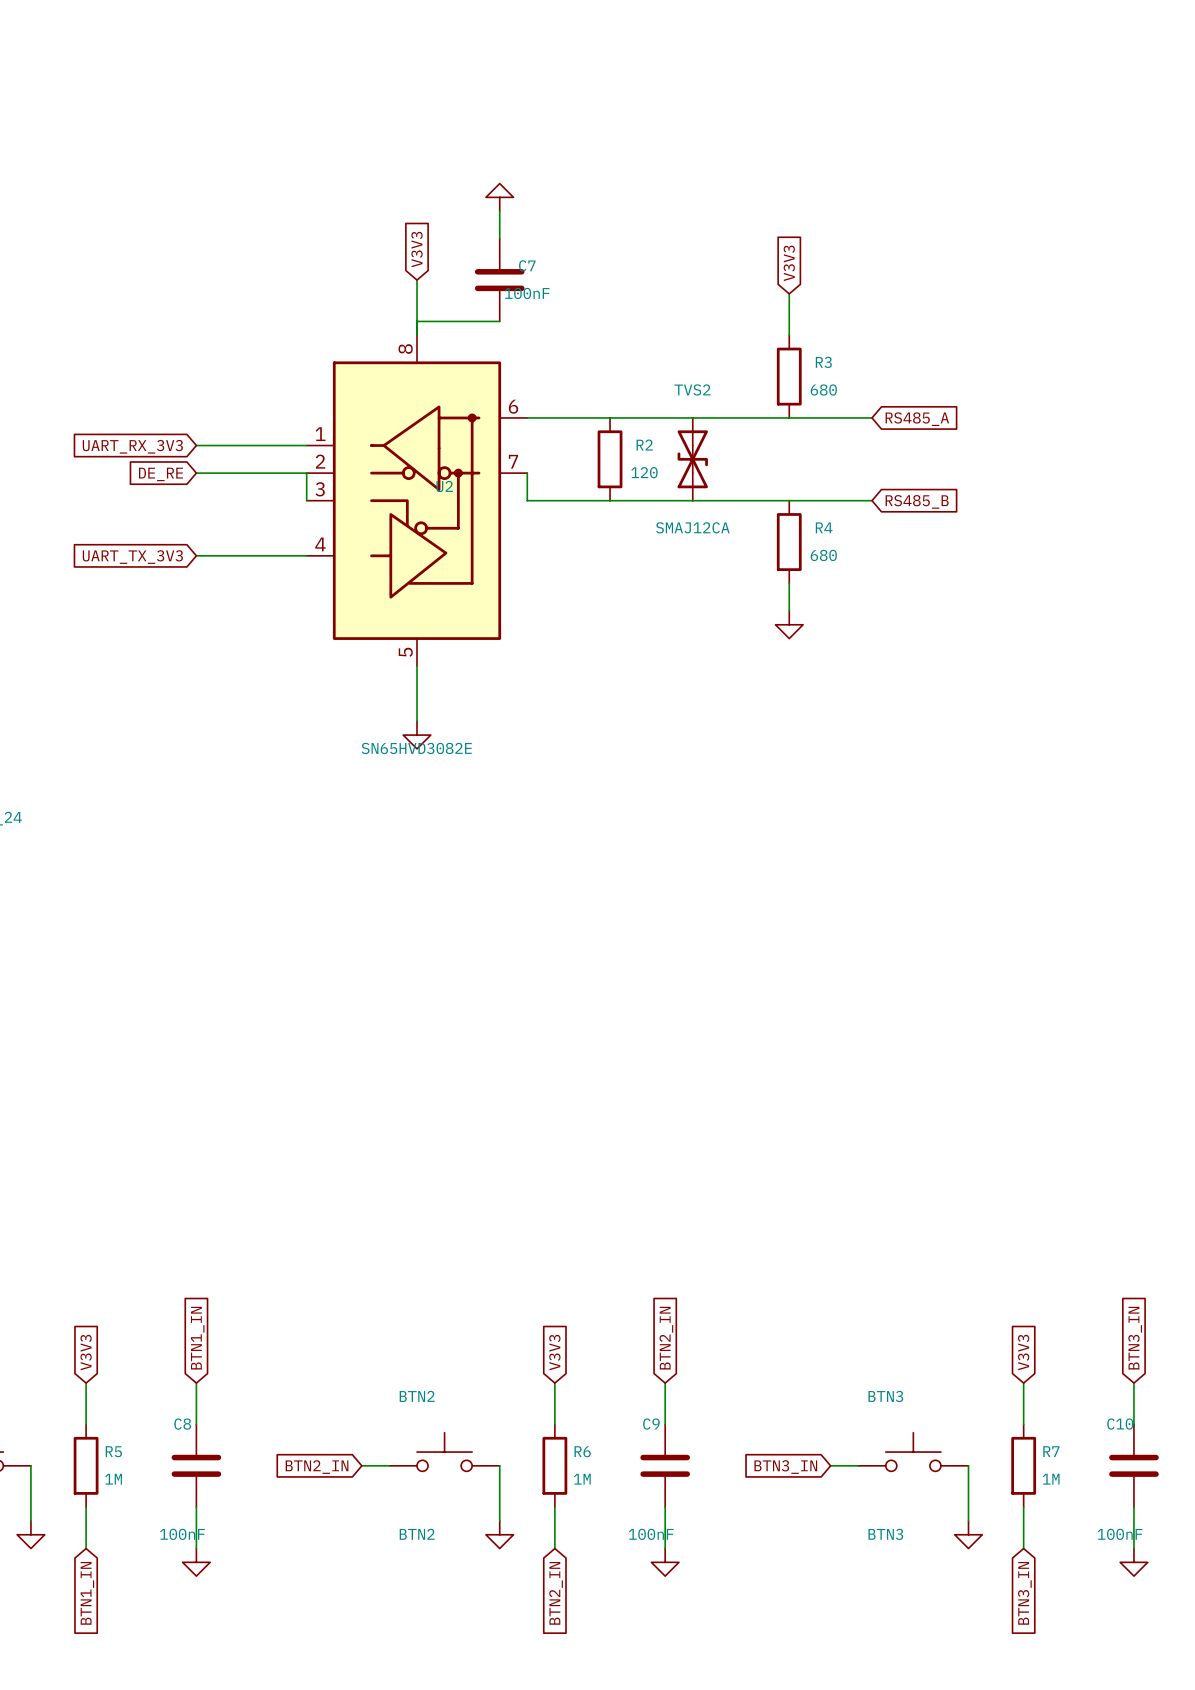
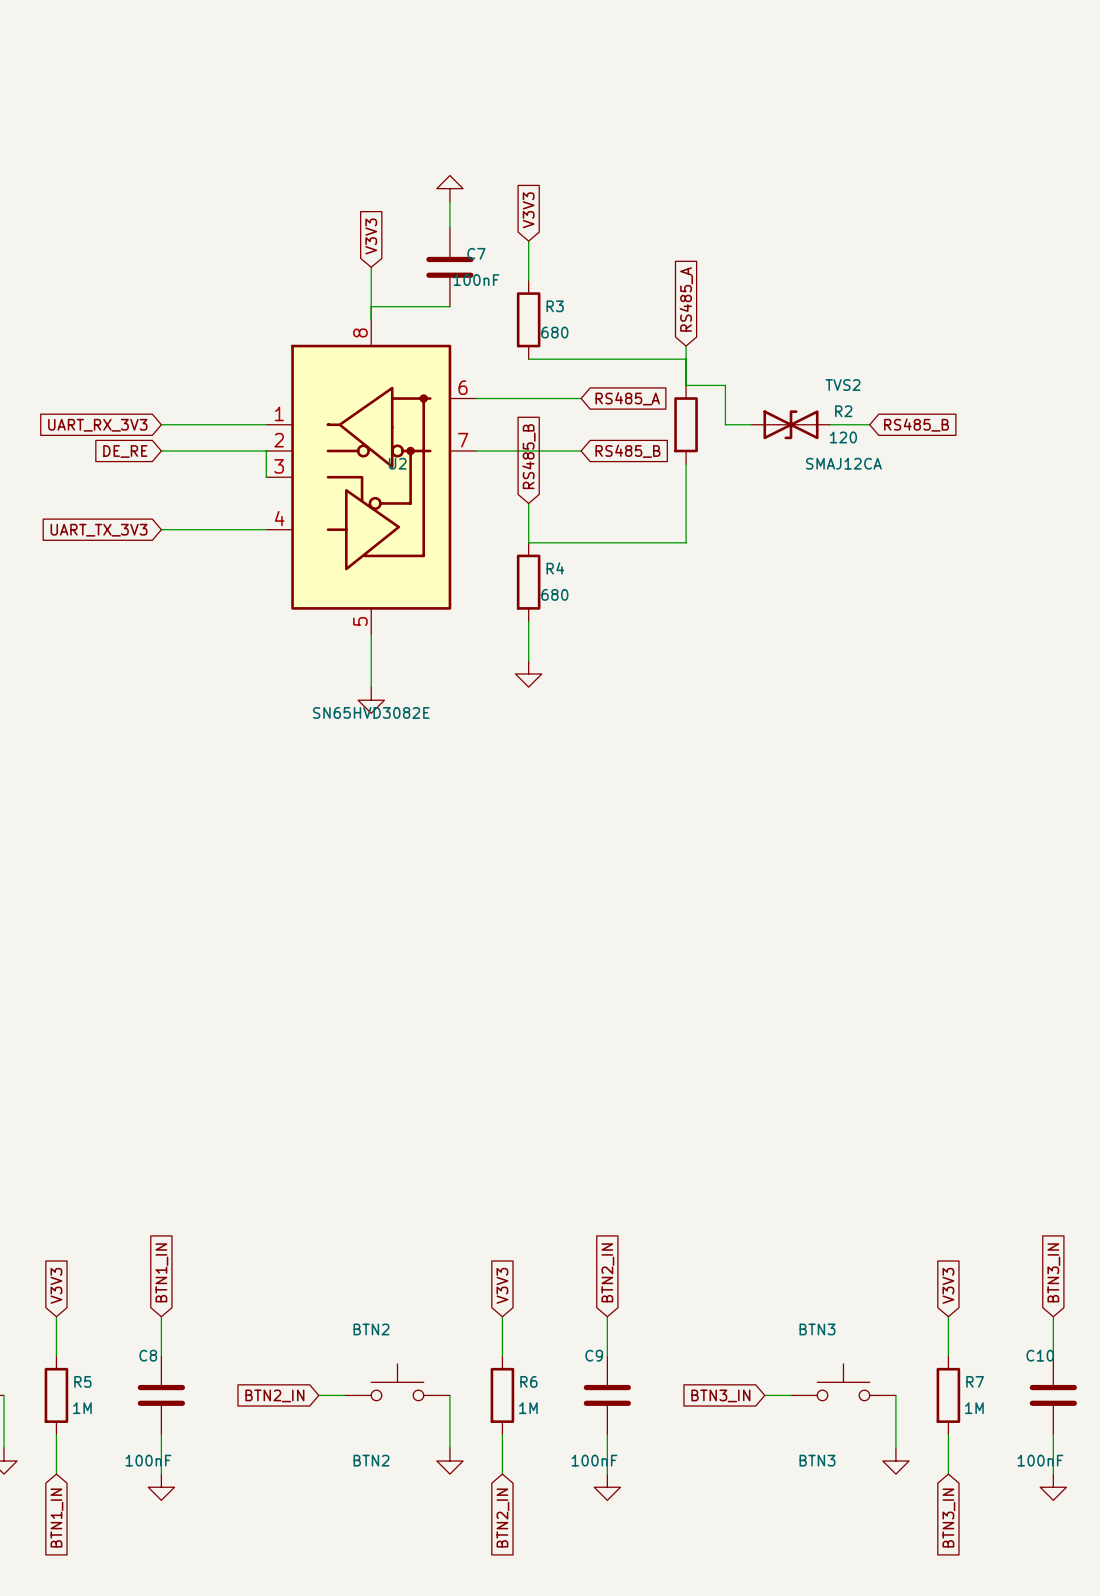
global label position: V3V3 (789, 263) -> V3V3 (528, 210)
wire: (789, 293) (789, 335) -> (528, 241) (528, 280)
global label: none -> RS485_A (686, 299)
wire: none -> (686, 346) (686, 385) (725, 385) (725, 424) (751, 424)
R3 name position: R3 (823, 362) -> R3 (555, 306)
wire: none -> (528, 359) (686, 359)
R3 position: (789, 376) -> (528, 319)
TVS2 name position: TVS2 (692, 389) -> TVS2 (842, 385)
R3 value position: 680 (823, 389) -> 680 (554, 332)
wire: (637, 417) (871, 417) -> none
global label: none -> RS485_A (627, 398)
global label: RS485_A (917, 419) -> none
R2 name position: R2 (644, 445) -> R2 (843, 411)
wire: none -> (830, 424) (869, 424)
R2 position: (610, 459) -> (686, 424)
TVS2 rotation: 0° (692, 459) -> 90° clockwise (791, 424)
TVS2 position: (692, 459) -> (791, 424)
R2 value position: 120 (644, 472) -> 120 (843, 437)
wire: (527, 473) (527, 500) (871, 500) -> (476, 450) (581, 450)
global label: none -> RS485_B (627, 451)
global label: none -> RS485_B (528, 456)
wire: none -> (686, 464) (686, 542) (528, 542) (528, 503)
global label position: RS485_B (917, 501) -> RS485_B (916, 425)
TVS2 value position: SMAJ12CA (692, 527) -> SMAJ12CA (843, 463)
R4 name position: R4 (824, 527) -> R4 (555, 568)
R4 position: (789, 542) -> (528, 582)
R4 value position: 680 (823, 555) -> 680 (554, 594)
wire: (789, 583) (789, 610) -> none
power symbol position: (789, 624) -> (528, 673)
wire: none -> (528, 621) (528, 660)

